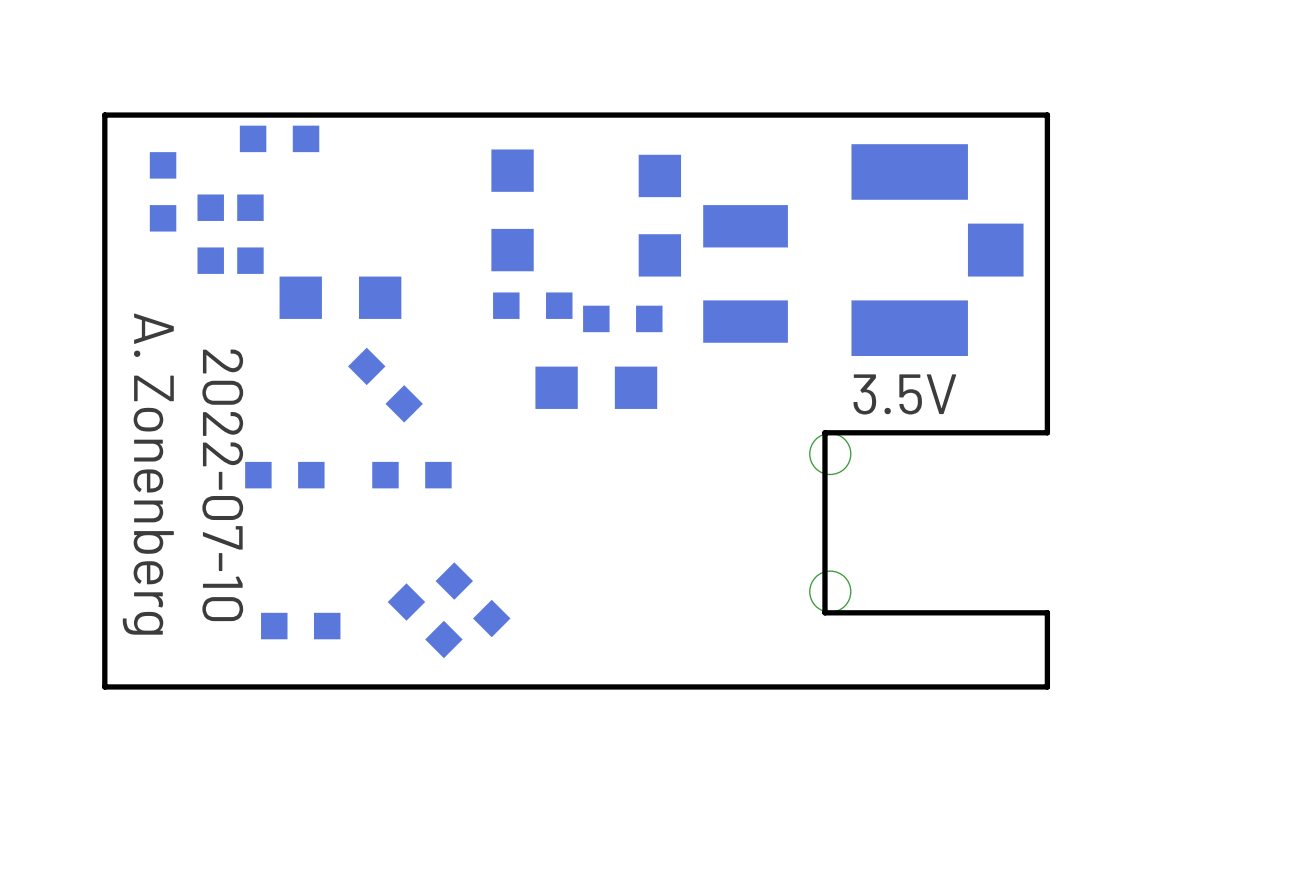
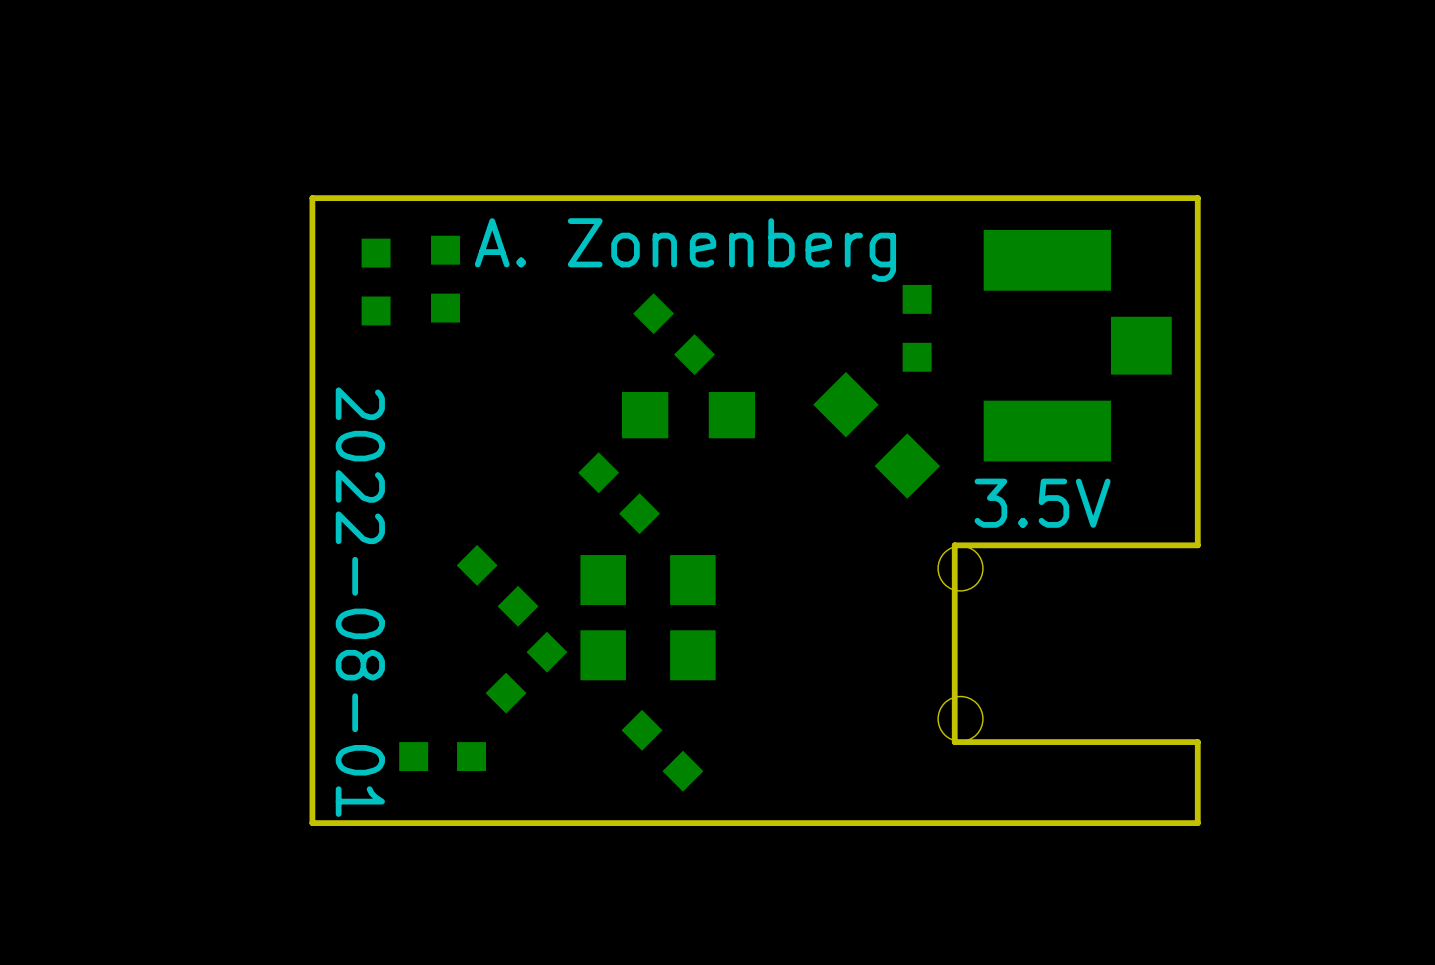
board edge: (237, 115) (104, 115) (104, 686) (237, 686) -> (312, 198) (312, 823)
part: (279, 138) -> none
part: none -> (445, 279)
part: (163, 191) -> none
part: none -> (376, 282)
part: (512, 210) -> none
part: (659, 215) -> none
part: (210, 234) -> none
part: (250, 234) -> none
part: none -> (917, 328)
part: none -> (674, 334)
part: (745, 273) -> none
part: (340, 297) -> none
part: (532, 305) -> none
part: none -> (688, 415)
part: (622, 318) -> none
part: none -> (876, 435)
part: (385, 385) -> none
part: none -> (619, 493)
part: (596, 387) -> none
part: none -> (648, 580)
text rotation: 0° (148, 474) -> 90° counterclockwise (685, 250)
text position: A. Zonenberg (148, 474) -> A. Zonenberg (685, 250)
part: (284, 475) -> none
part rotation: 0° (411, 475) -> 45° clockwise (497, 585)
text: 2022-07-10 (222, 485) -> 2022-08-01 (360, 602)
part: none -> (648, 655)
part: none -> (526, 672)
part: (473, 599) -> none
part: (425, 620) -> none
part: none -> (662, 750)
part position: (300, 626) -> (442, 756)

